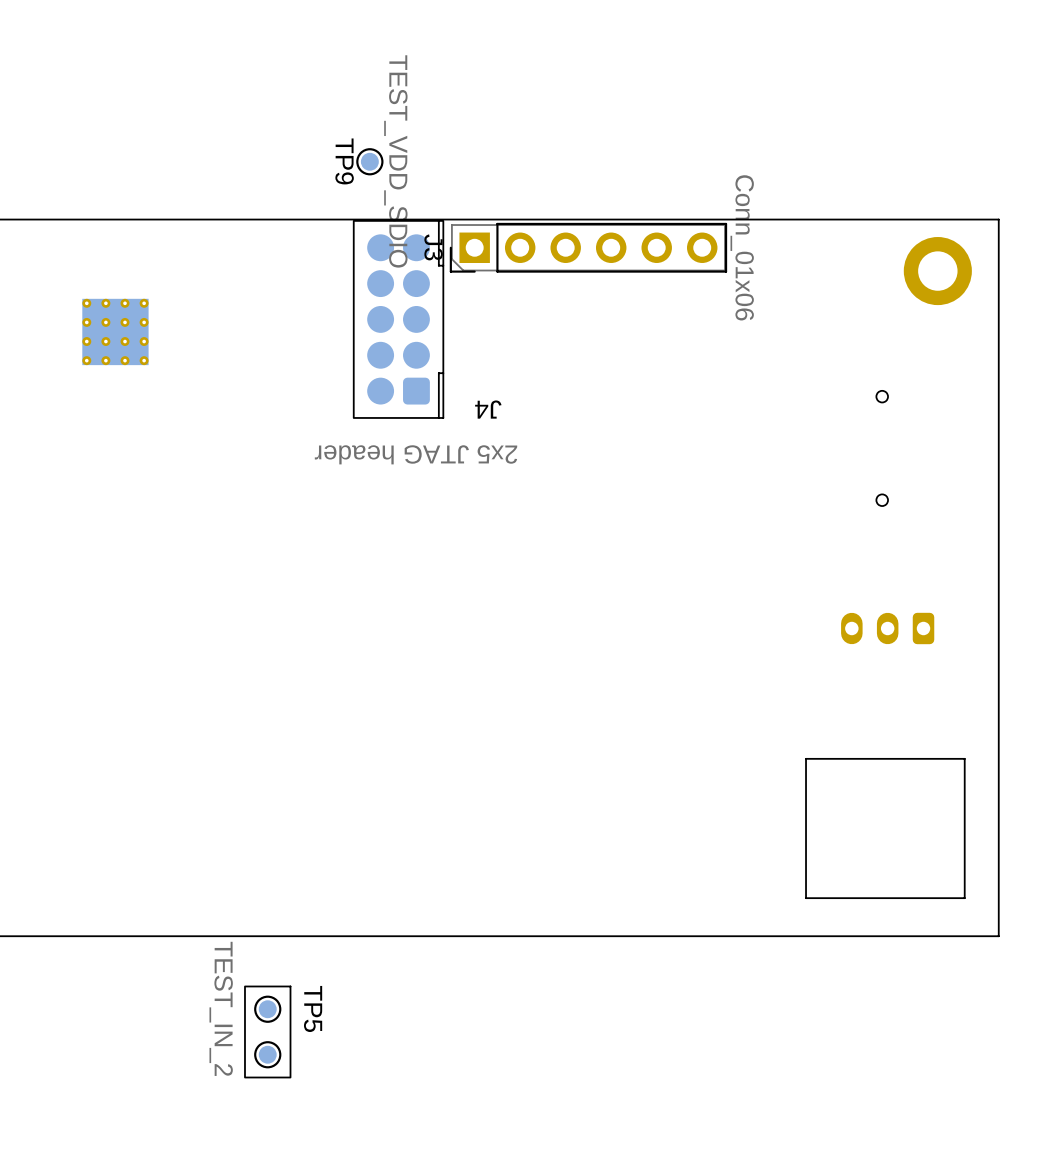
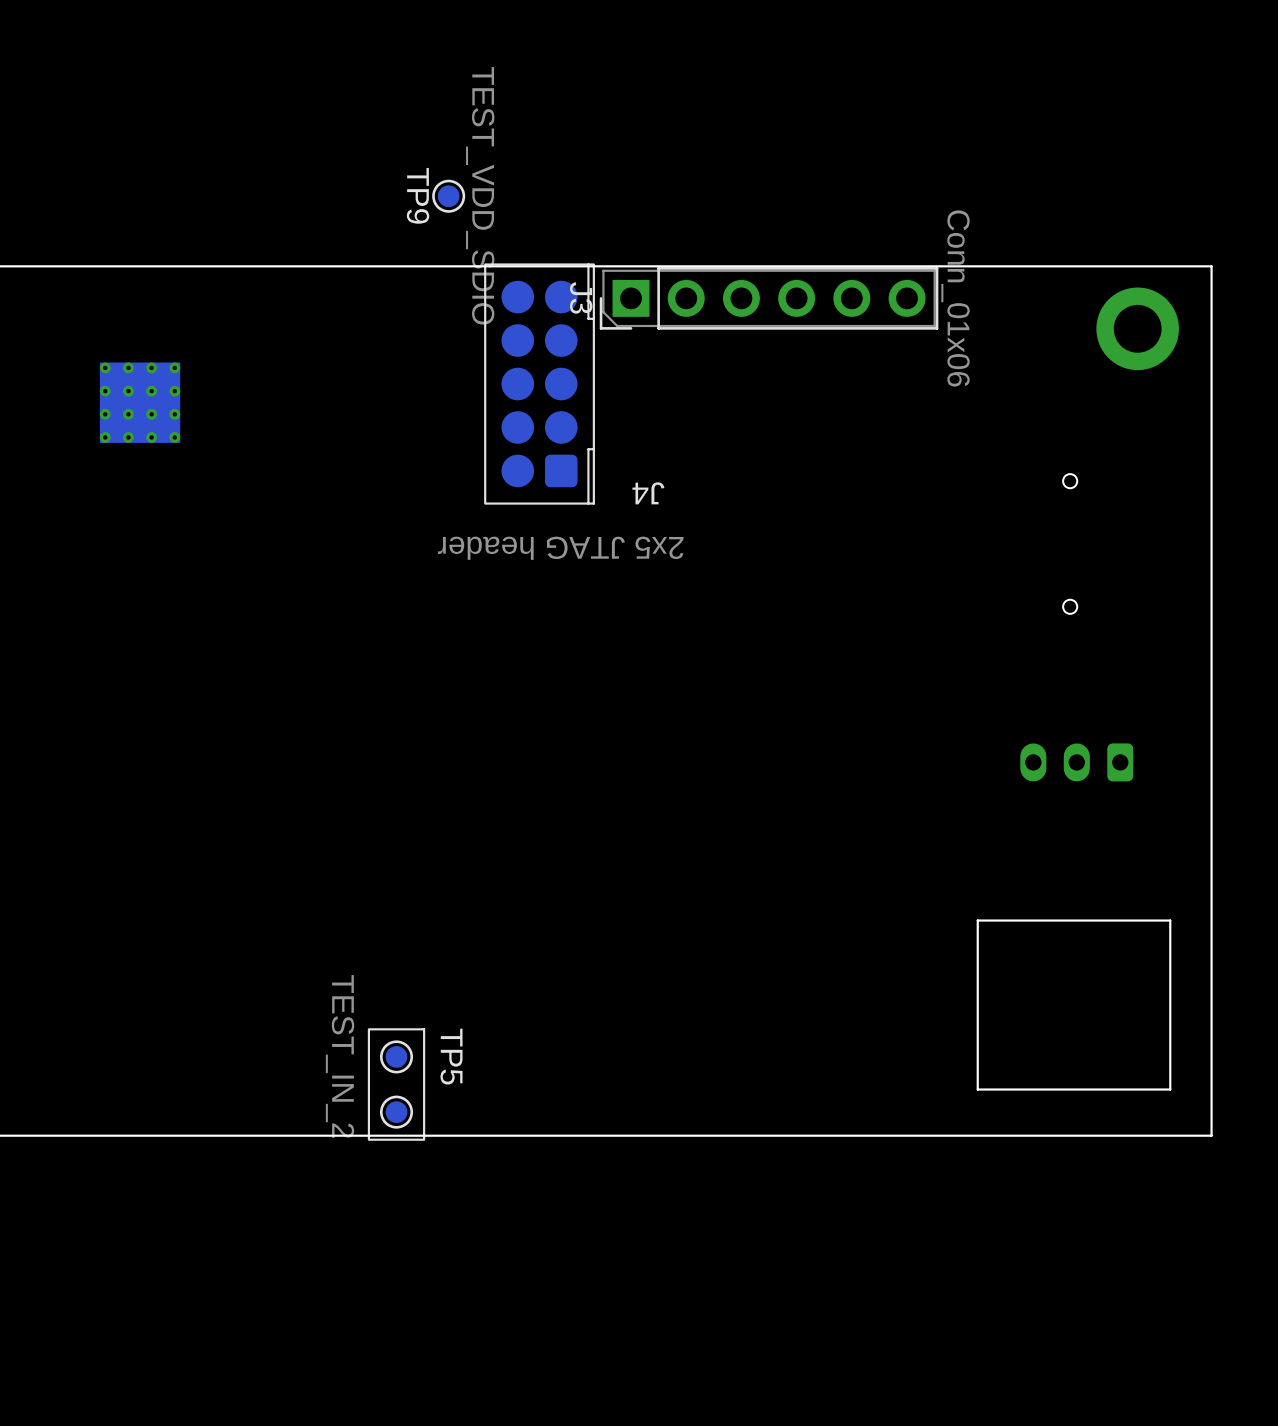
J3 footprint: [449, 222, 728, 273] -> [599, 267, 939, 330]
J4 position: (398, 319) -> (539, 384)
TP5 position: (267, 1031) -> (396, 1084)

